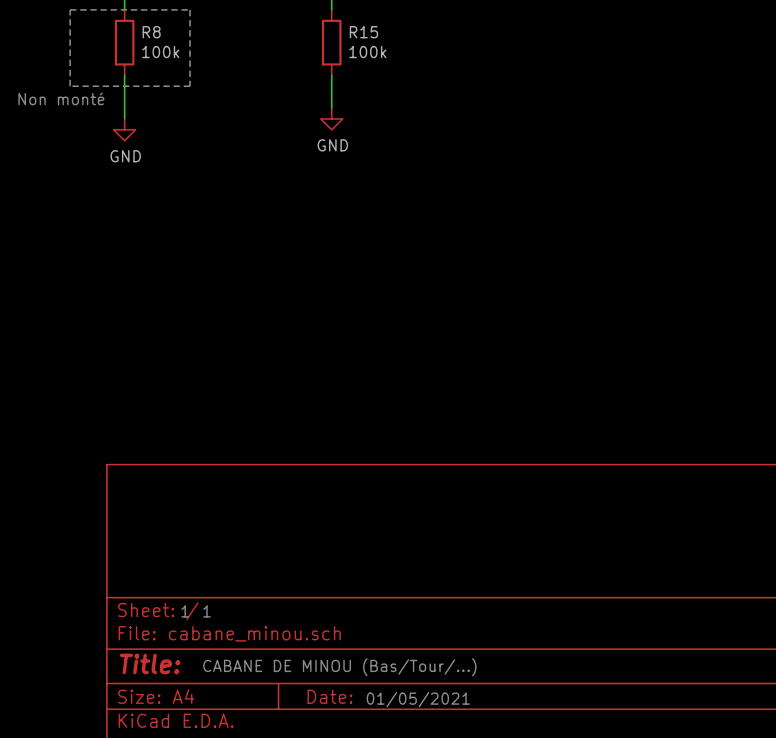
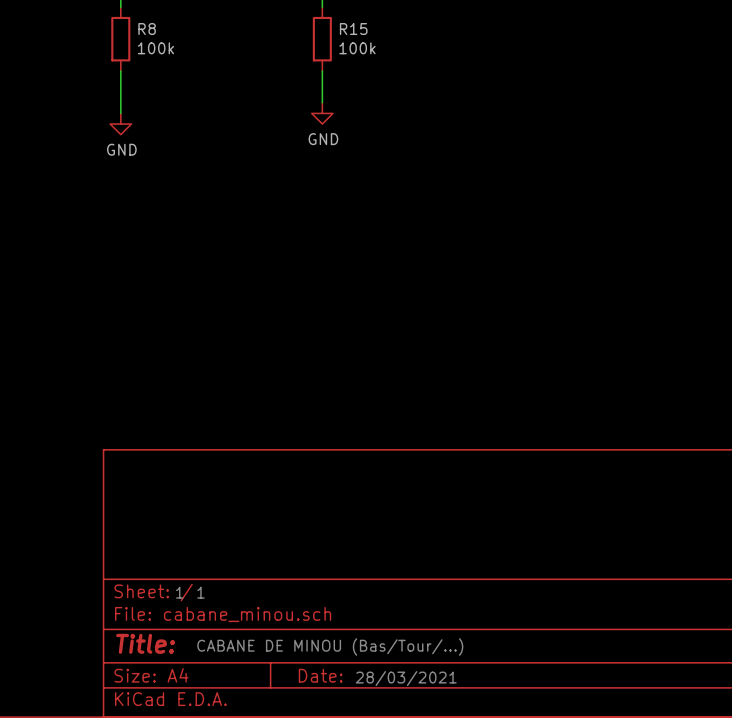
line: (70, 9) (70, 86) (190, 86) (190, 9) (70, 9) -> none
text: Non monté (61, 98) -> none
text: 01/05/2021 (418, 699) -> 28/03/2021 (406, 678)

